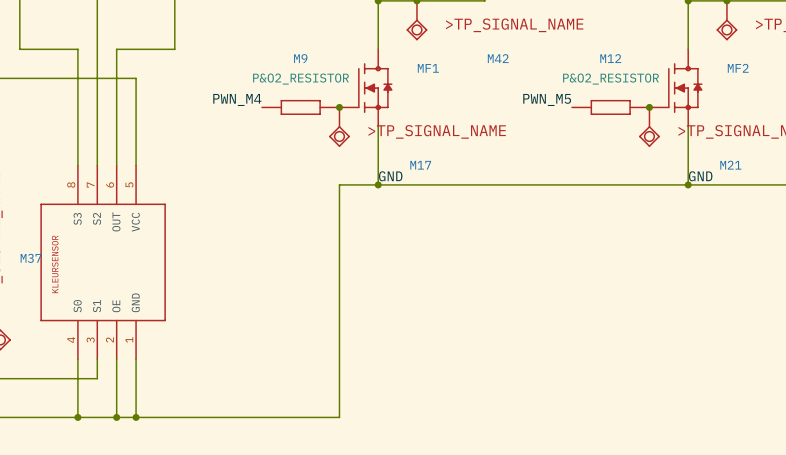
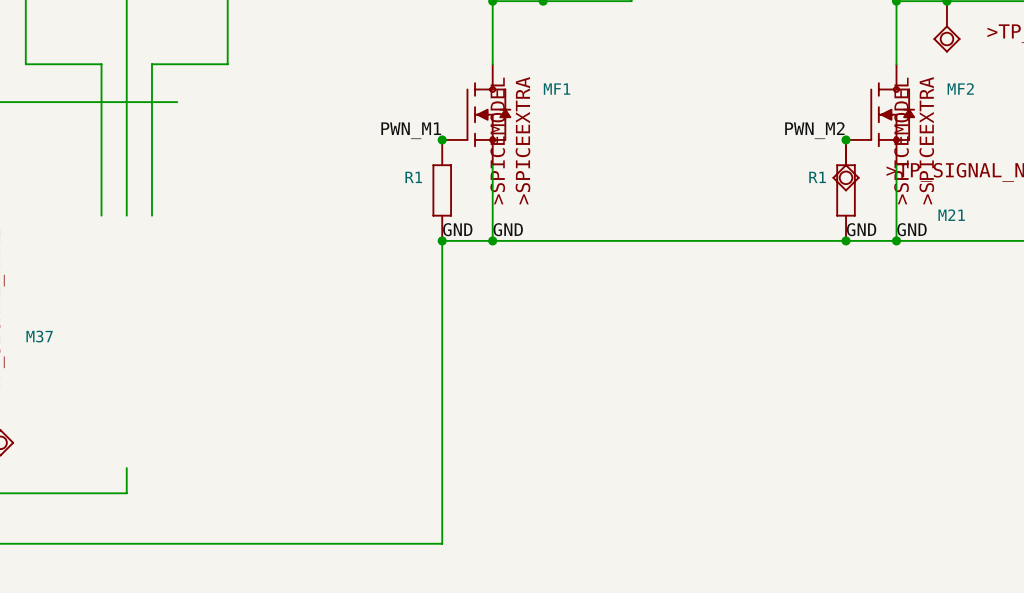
M42: (416, 20) -> none
wire: (136, 78) (136, 165) -> none
label: PWN_M4 (237, 99) -> none
label: none -> PWN_M1 (411, 130)
label: PWN_M5 (547, 99) -> none
label: none -> PWN_M2 (814, 130)
M9: P&O2_RESISTOR (300, 107) -> none
M12: P&O2_RESISTOR (610, 107) -> none
M17: (339, 126) -> none
R1: none -> (442, 190)
R1: none -> (846, 190)
label: none -> GND (457, 229)
label: none -> GND (861, 229)
junction: none -> (442, 240)
junction: none -> (846, 240)
part: (103, 262) -> none
wire: (77, 359) (77, 417) -> none
wire: (116, 359) (116, 417) -> none
wire: (136, 359) (136, 417) -> none
junction: (77, 417) -> none
junction: (116, 417) -> none
junction: (136, 417) -> none

